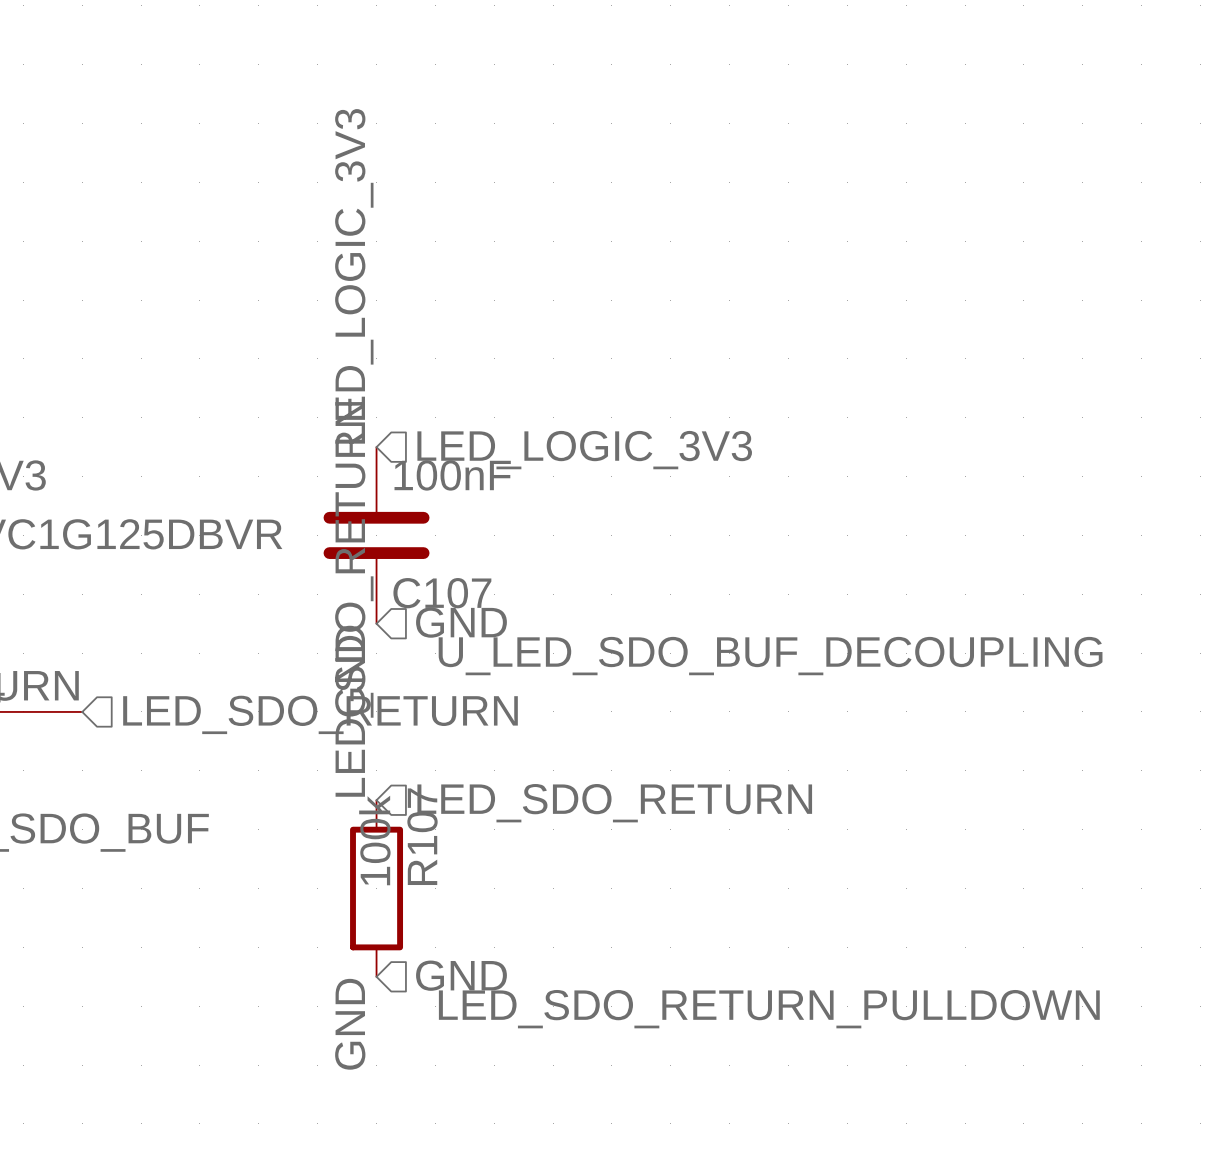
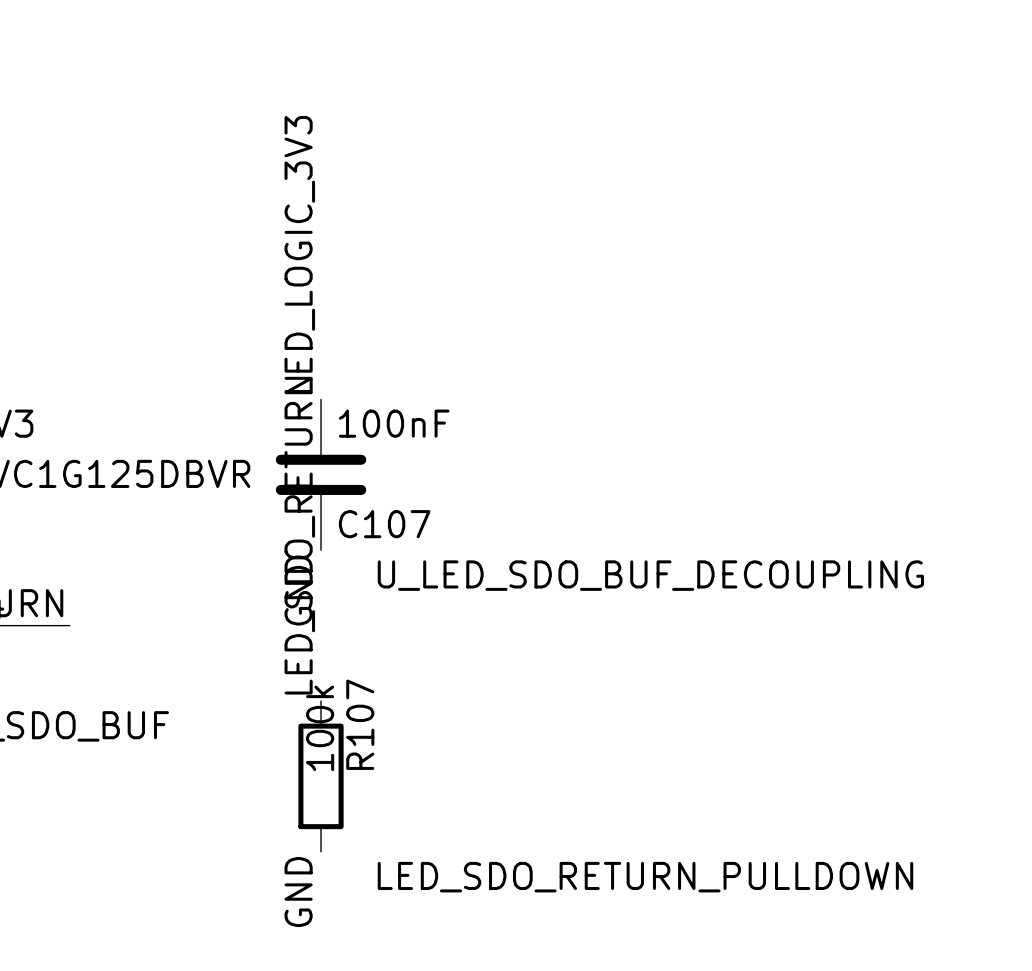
hierarchical label: LED_LOGIC_3V3 (584, 450) -> none
hierarchical label: GND (461, 622) -> none
hierarchical label: LED_SDO_RETURN (320, 714) -> none
hierarchical label: LED_SDO_RETURN (614, 803) -> none
hierarchical label: GND (461, 975) -> none

